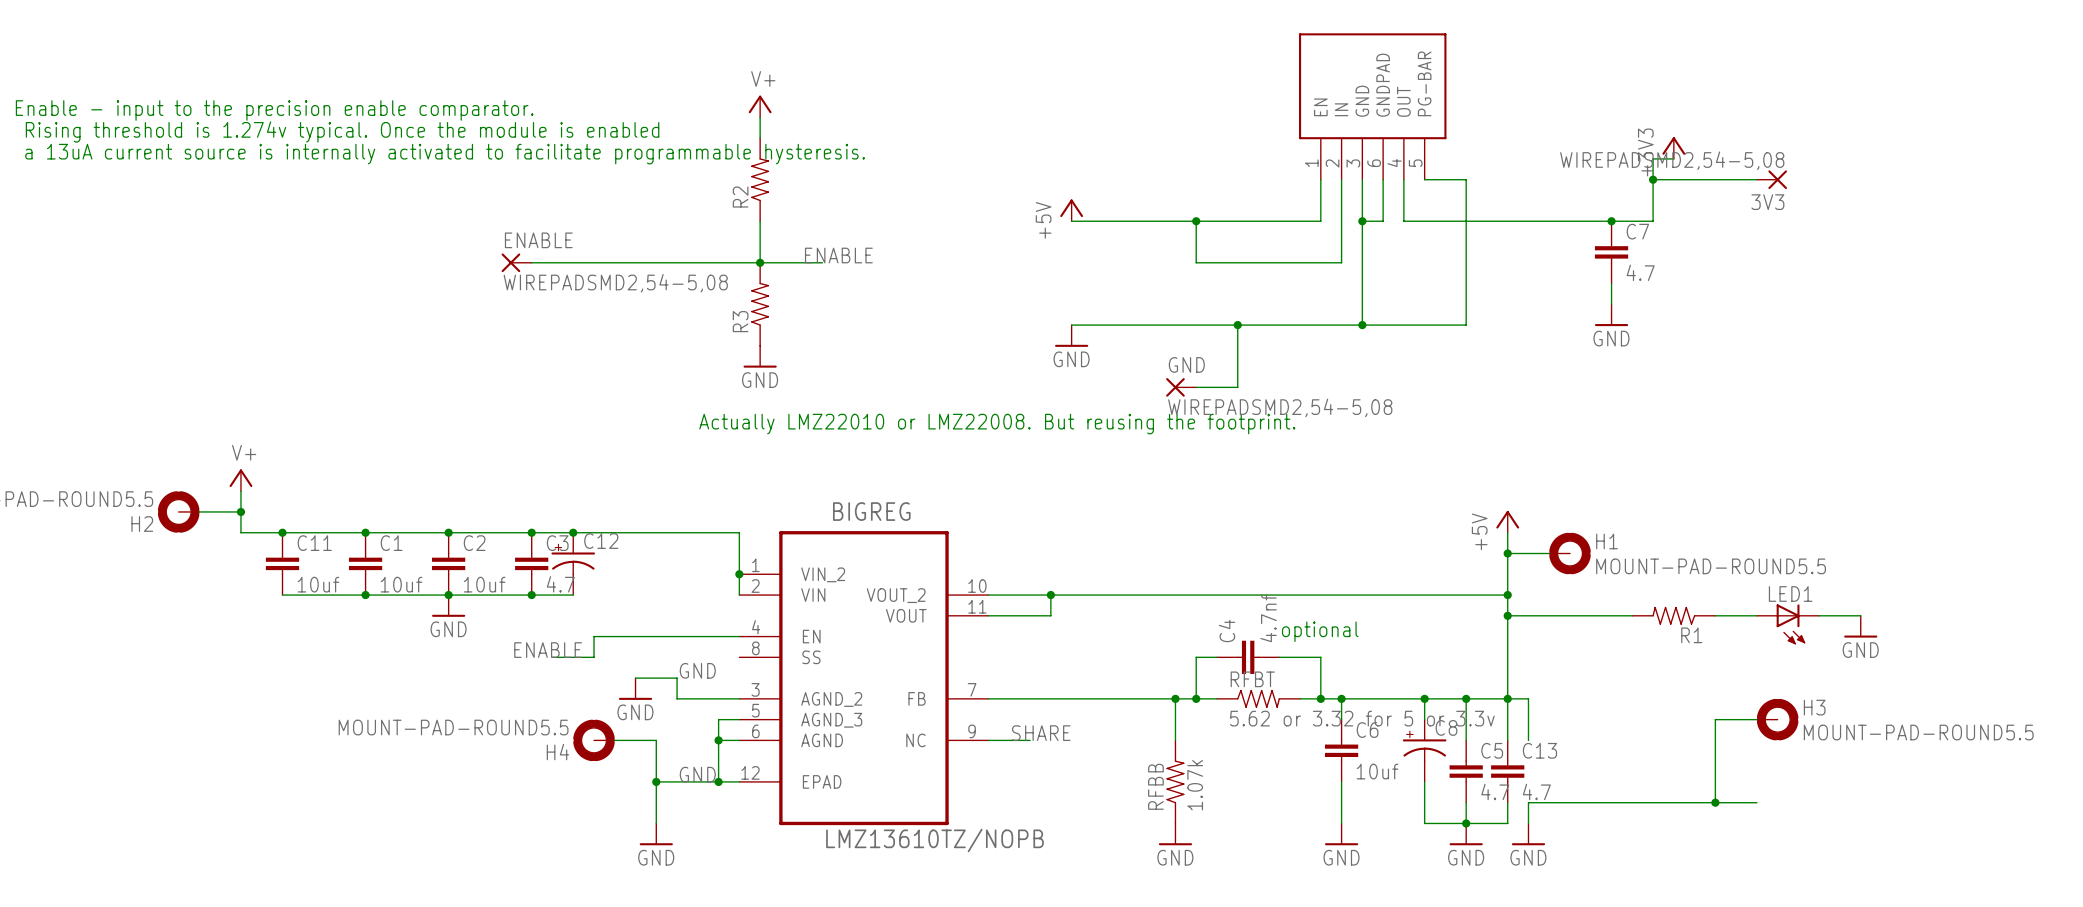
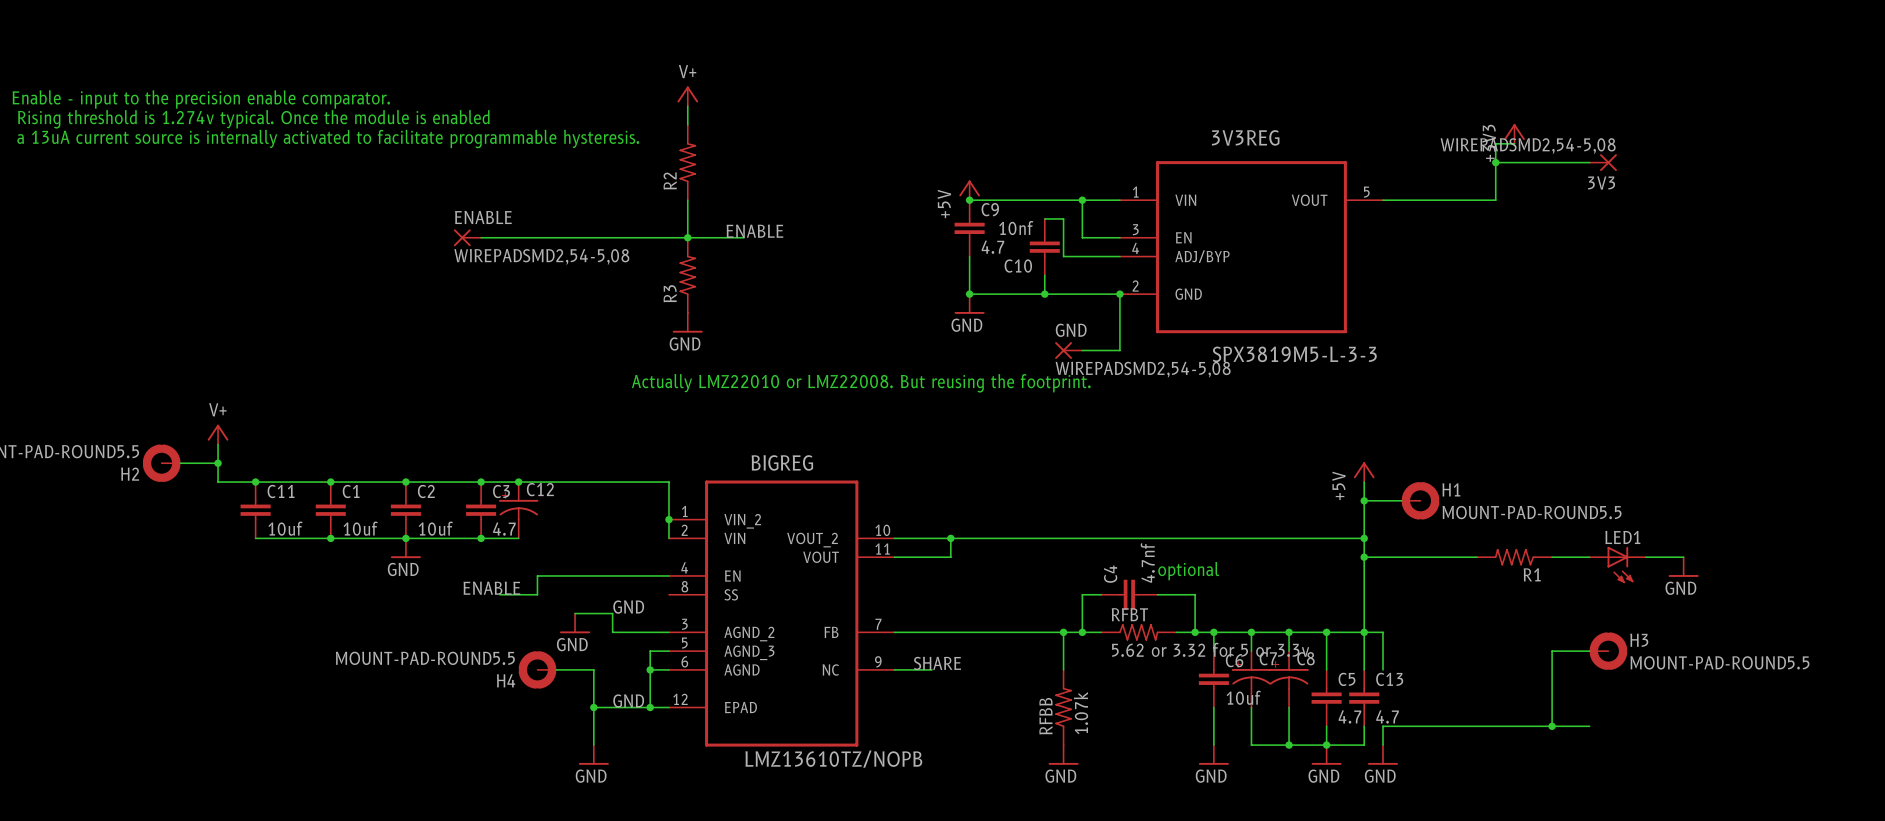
part: (1372, 106) -> none
wire: (1320, 179) (1320, 221) (1237, 221) -> none
wire: (1341, 179) (1341, 262) (1237, 262) -> none
wire: (1362, 179) (1362, 325) -> none
wire: (1383, 179) (1383, 221) (1362, 221) -> none
wire: (1403, 179) (1403, 221) (1528, 221) -> none
wire: (1424, 179) (1466, 179) (1466, 325) (1237, 325) -> none
junction: none -> (969, 200)
junction: (1362, 221) -> none
C7 symbol: [1594, 221, 1629, 284] -> [1231, 651, 1272, 708]
junction: (1611, 221) -> none
wire: none -> (1044, 218) (1063, 218) (1063, 256) (1119, 256)
C9: none -> 4.7 (969, 228)
C7 value: 4.7 (1640, 272) -> none
C10: none -> 10nf (1044, 247)
3V3REG: none -> SPX3819M5-L-3-3 (1251, 247)
wire: none -> (969, 256) (969, 294)
wire: (1611, 283) (1611, 304) -> none
wire: none -> (1044, 275) (1044, 294)
power symbol: GND (1611, 315) -> none
junction: none -> (969, 294)
junction: none -> (1044, 294)
junction: (1362, 325) -> none
wire: none -> (1251, 632) (1251, 651)
junction: none -> (1251, 632)
wire: none -> (1251, 707) (1251, 745) (1289, 745)
junction: none -> (1289, 745)

